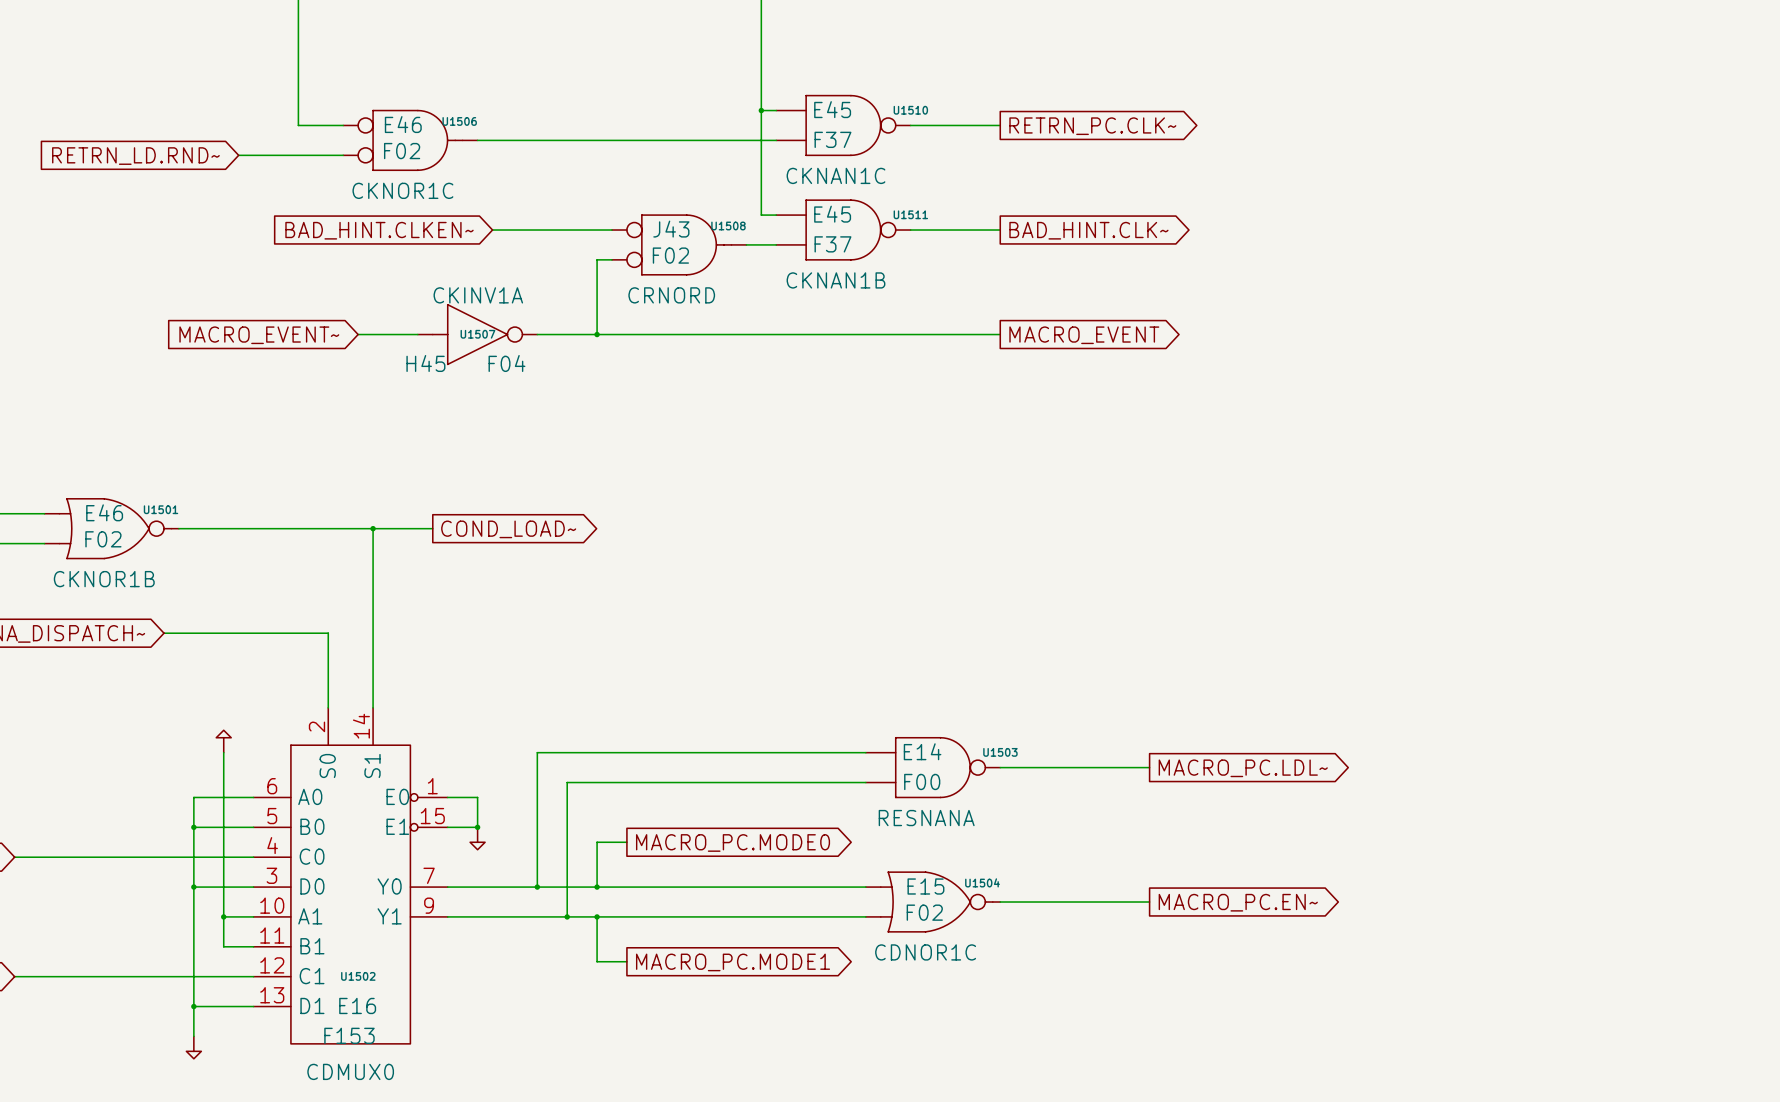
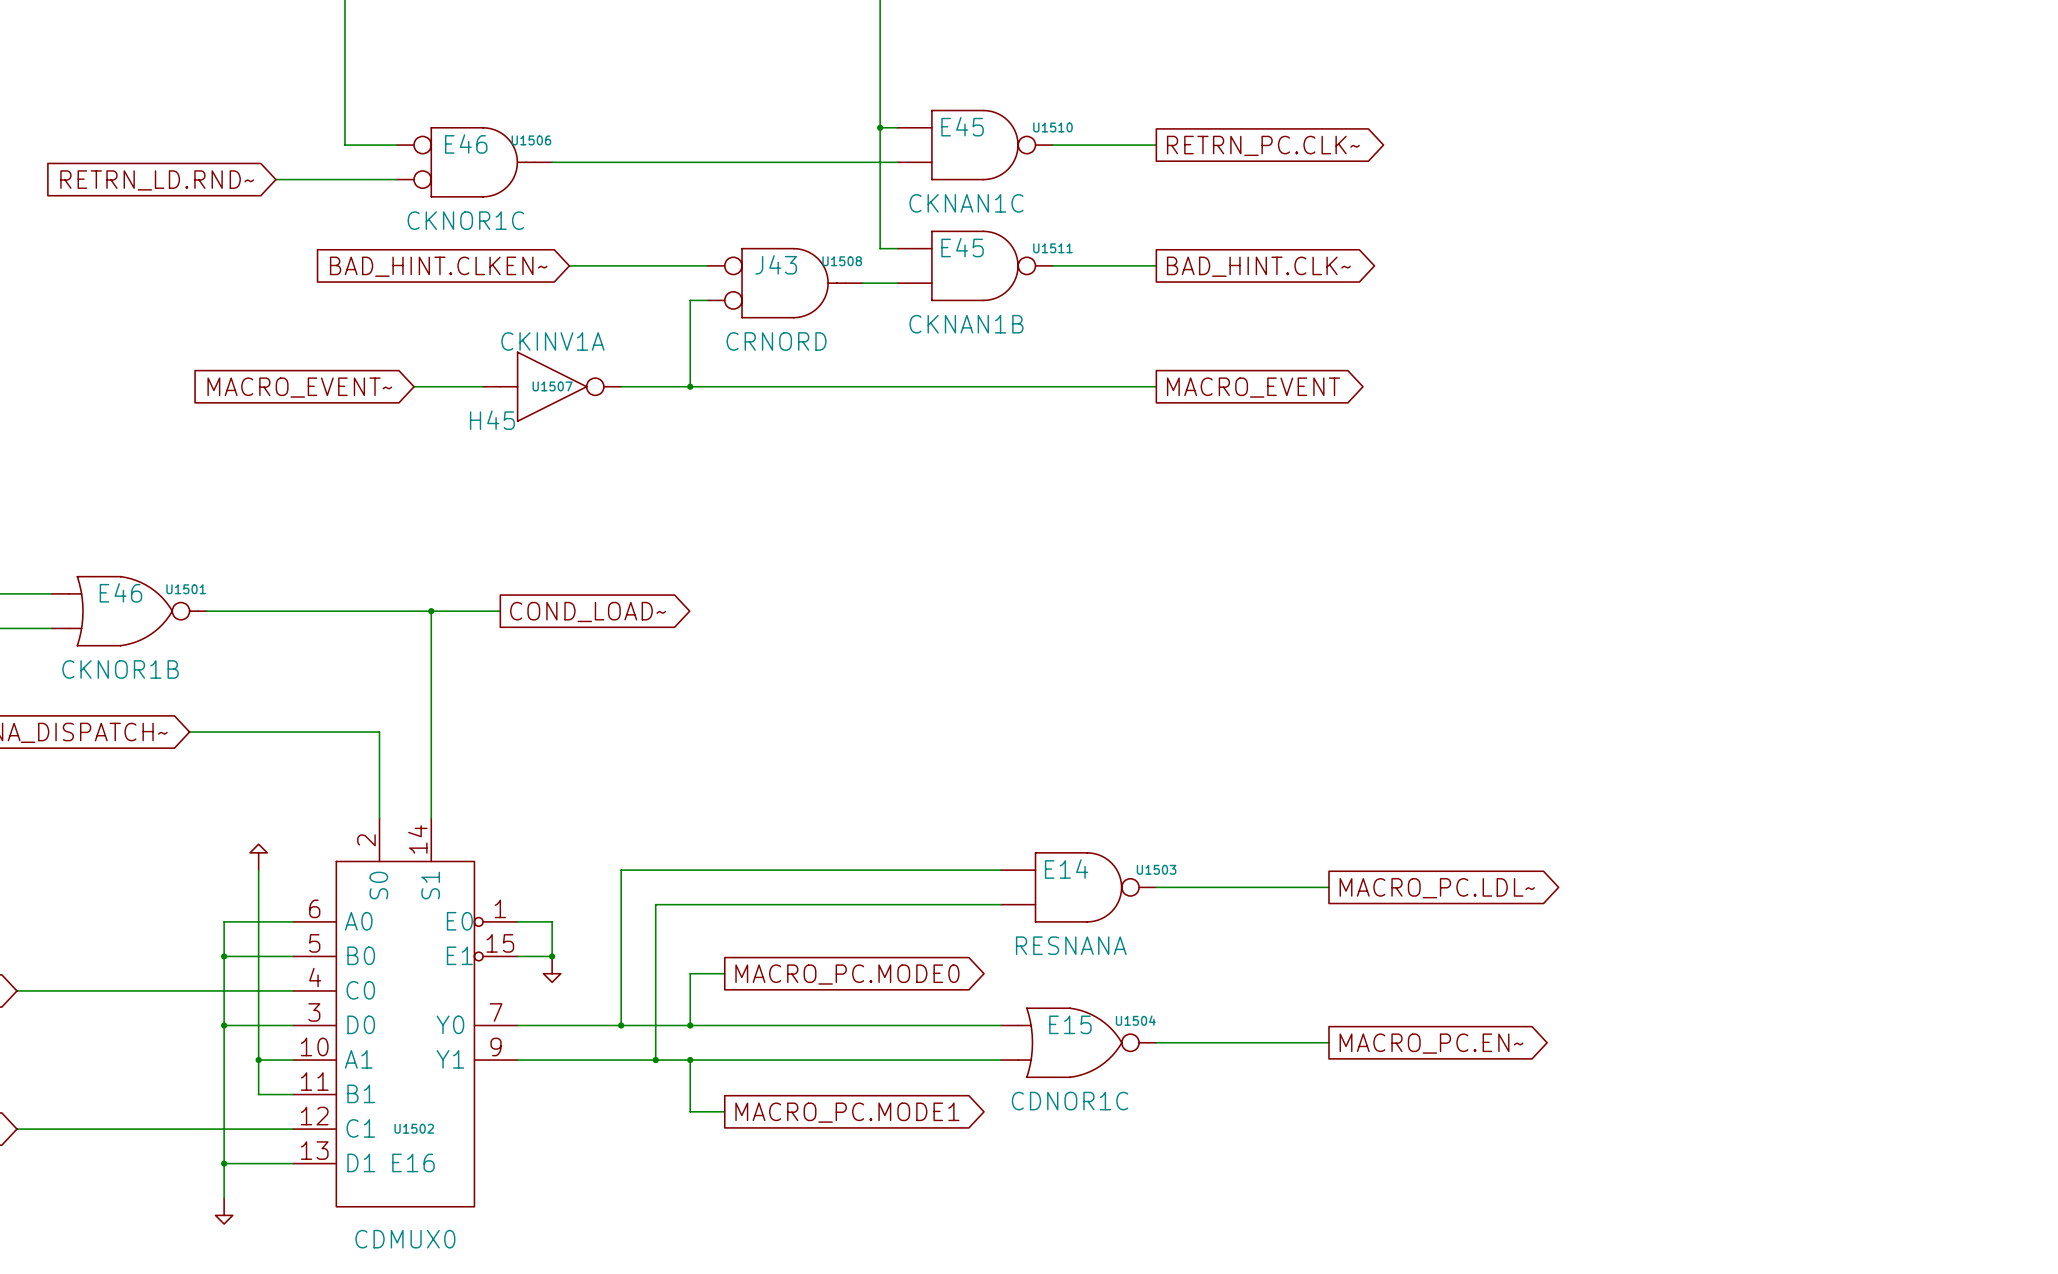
U1510 value: F37 (832, 139) -> none
U1506 value: F02 (402, 151) -> none
U1511 value: F37 (832, 244) -> none
U1508 value: F02 (670, 255) -> none
U1507 value: F04 (506, 363) -> none
U1501 value: F02 (103, 539) -> none
U1503 value: F00 (922, 781) -> none
U1504 value: F02 (924, 912) -> none
U1502 value: F153 (349, 1035) -> none

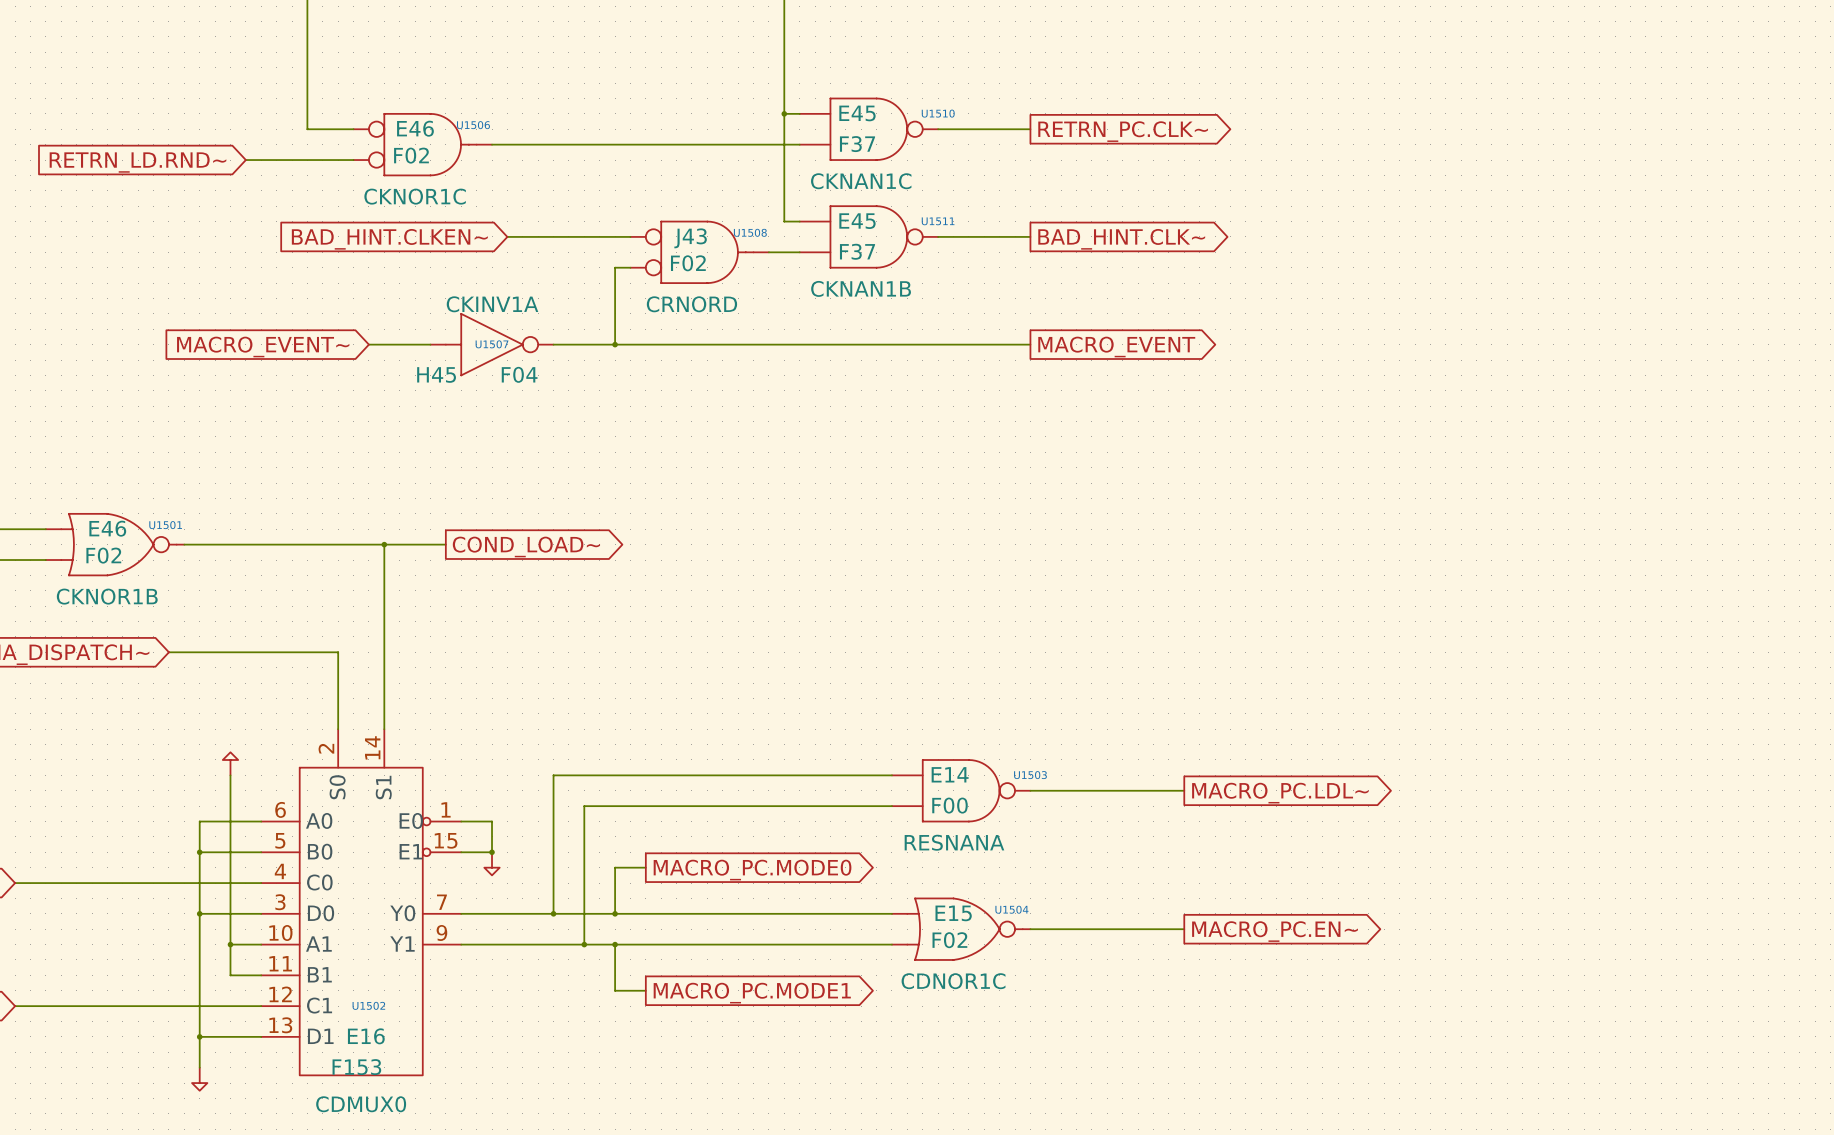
U1510 value: none -> F37 (857, 144)
U1506 value: none -> F02 (411, 155)
U1511 value: none -> F37 (857, 251)
U1508 value: none -> F02 (688, 263)
U1507 value: none -> F04 (519, 374)
U1501 value: none -> F02 (103, 555)
U1503 value: none -> F00 (950, 805)
U1504 value: none -> F02 (949, 940)
U1502 value: none -> F153 (356, 1067)

